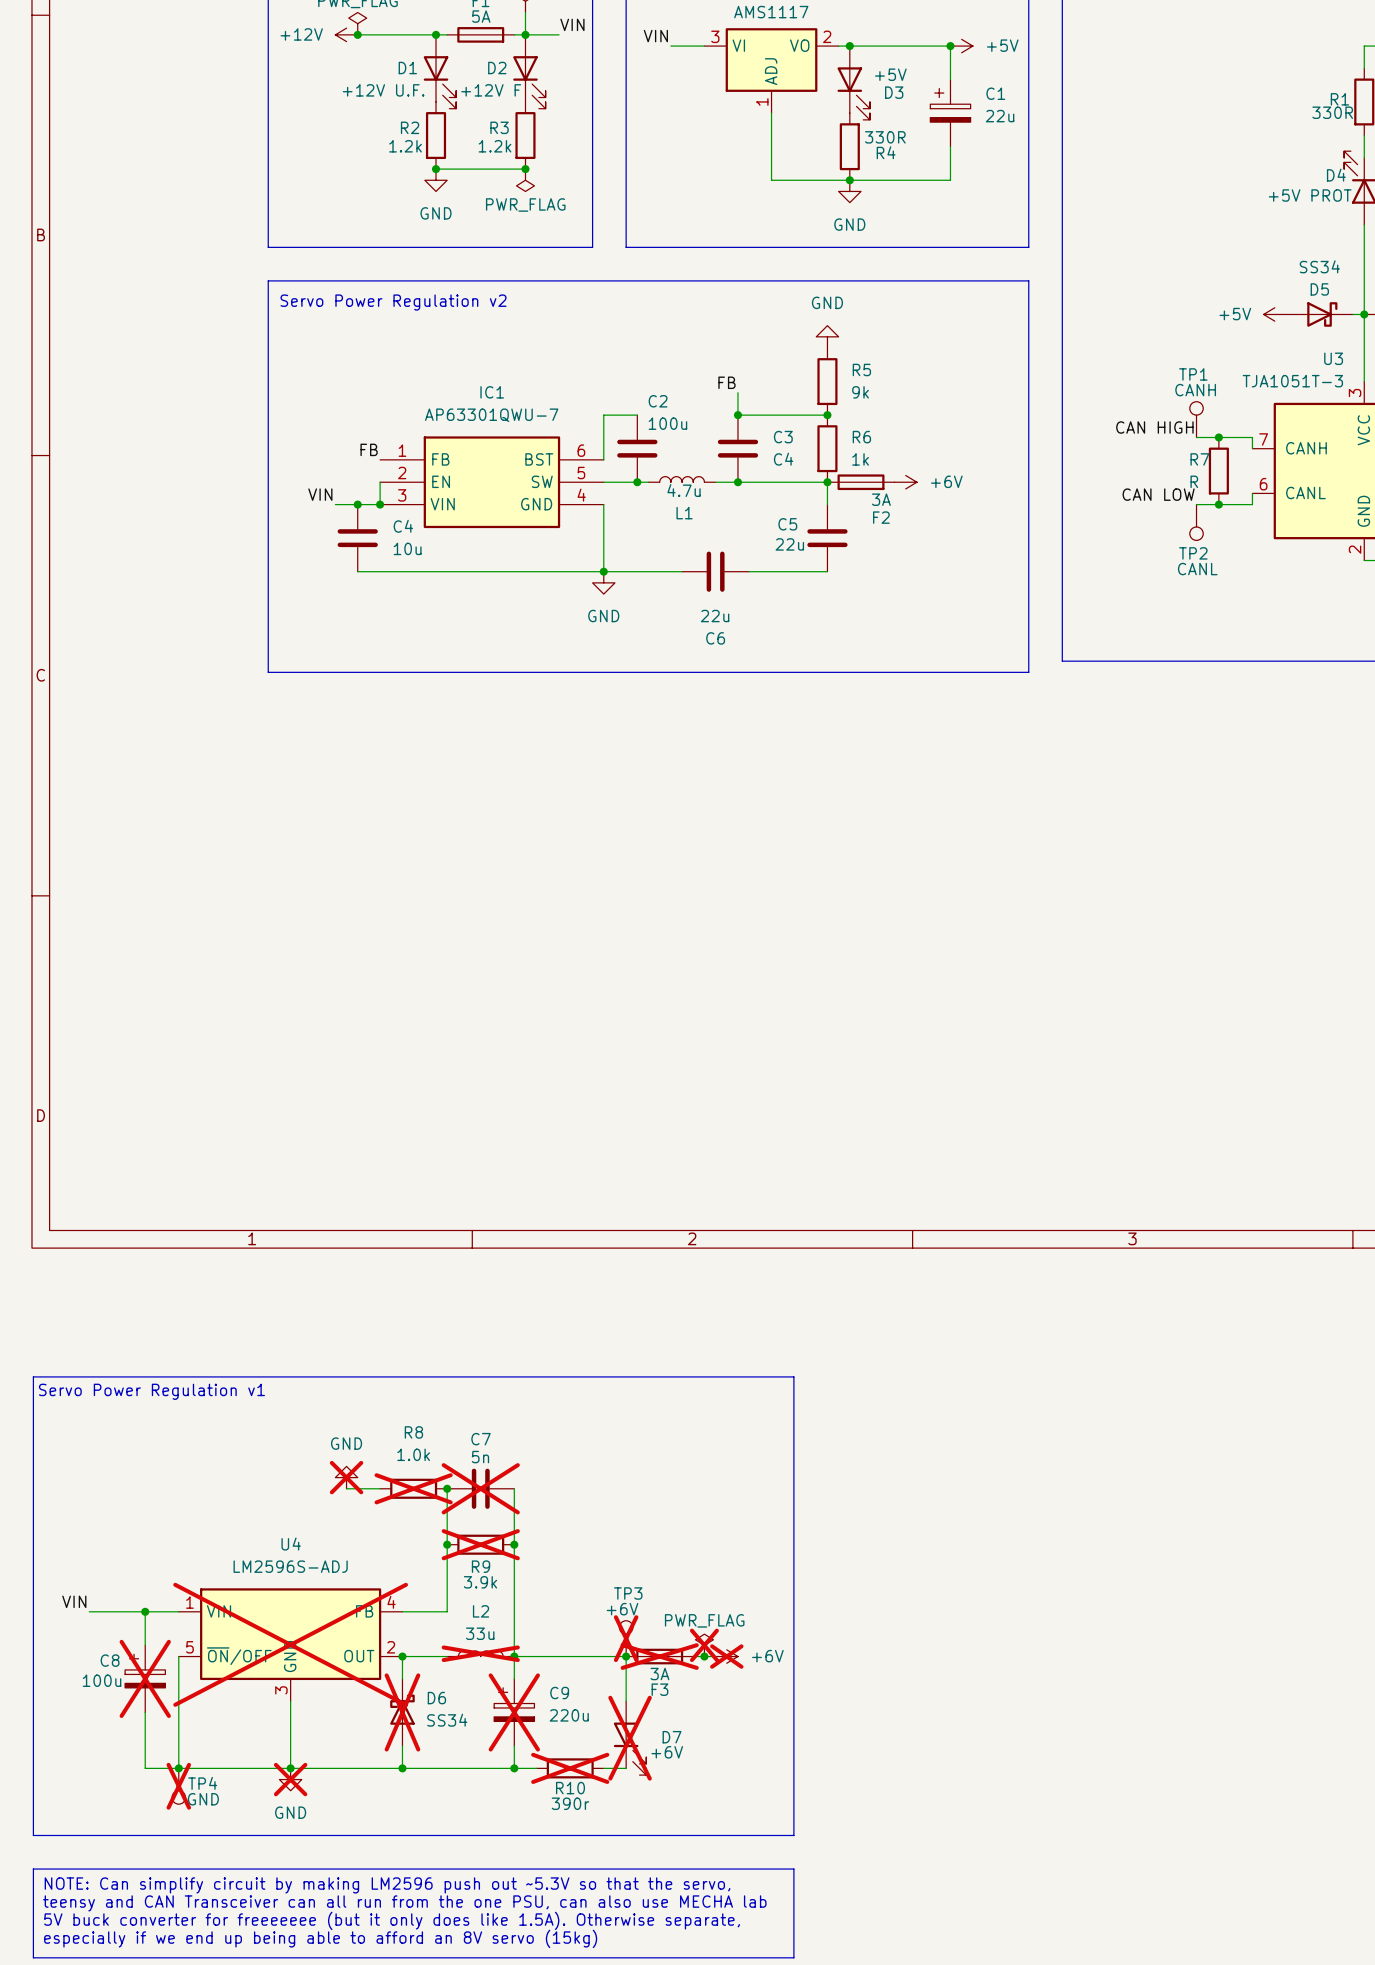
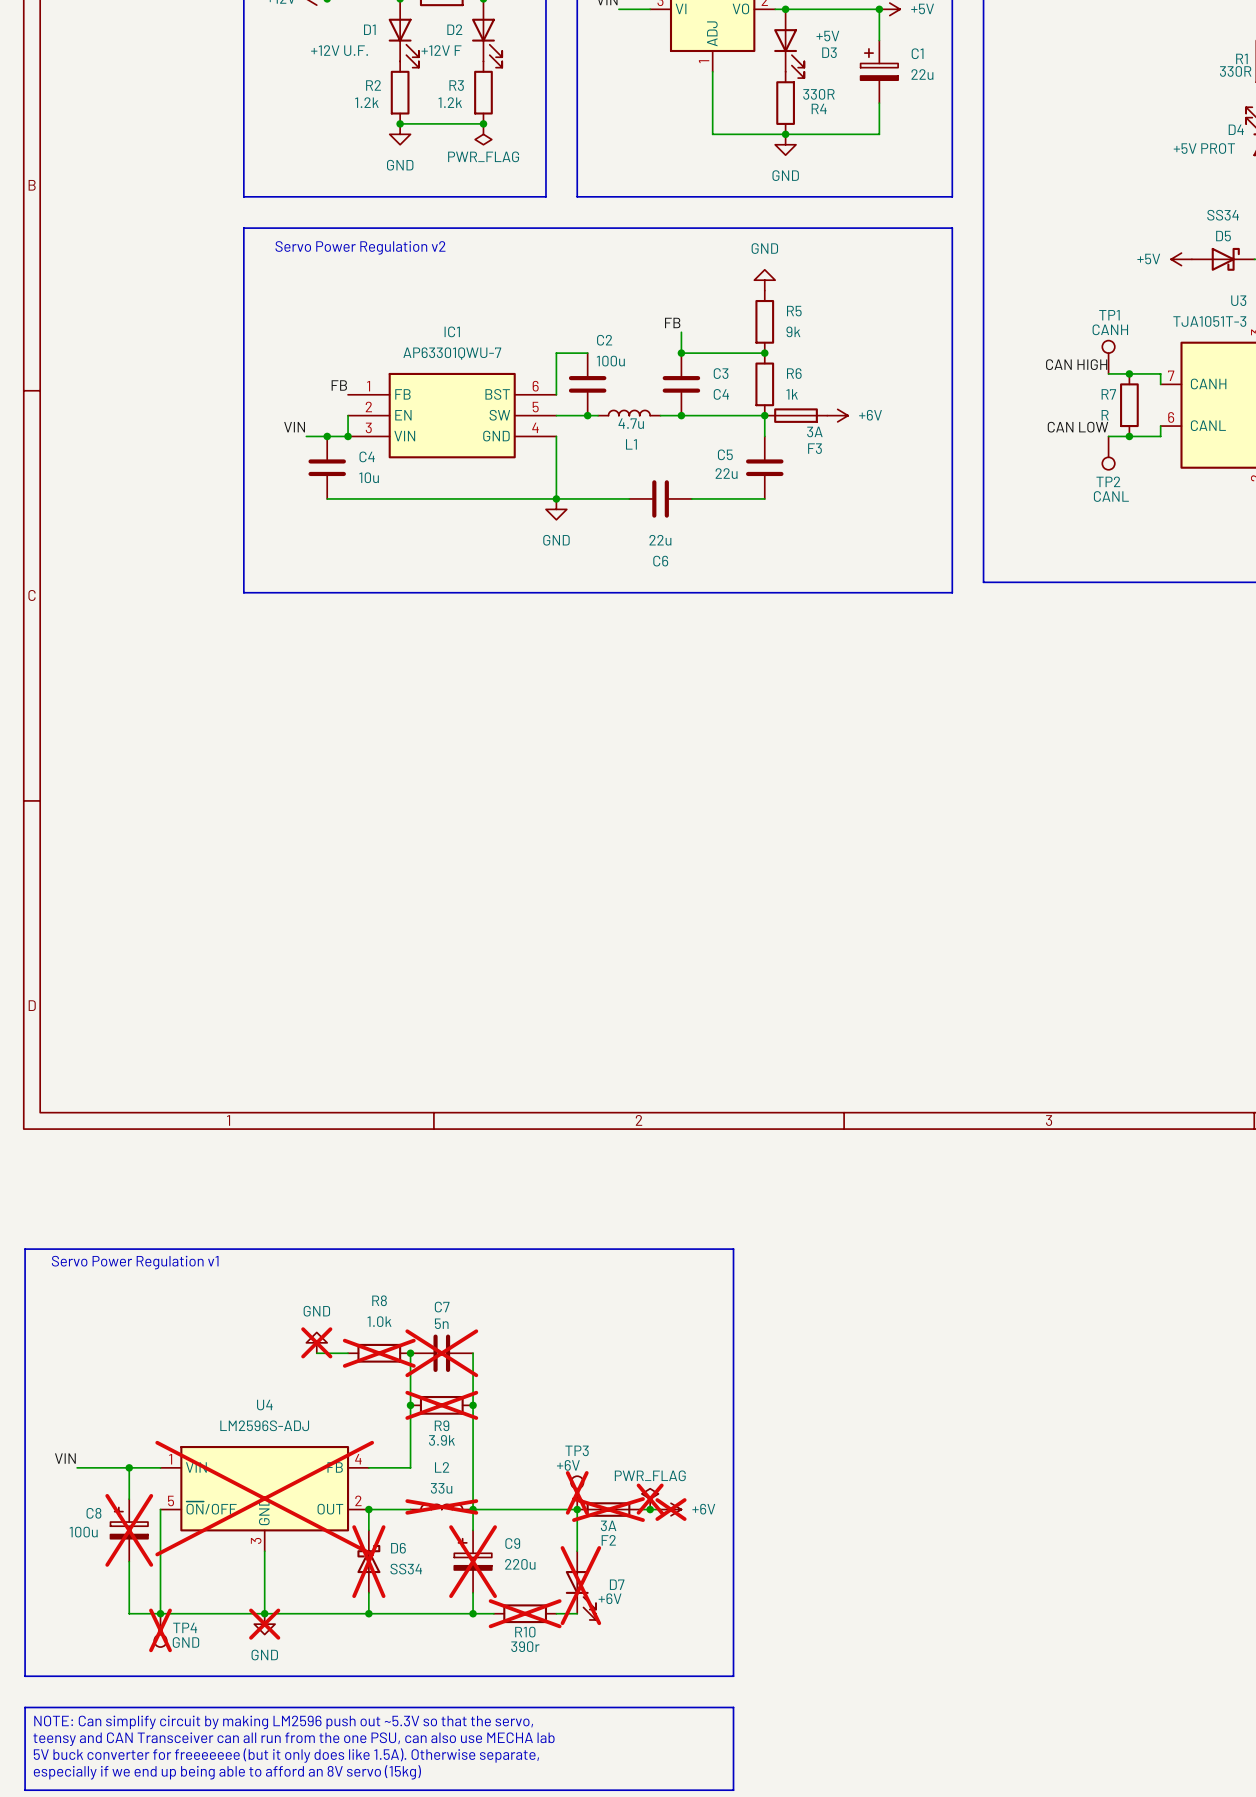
F2 name: F2 (881, 517) -> F3 (814, 448)
F3 name: F3 (659, 1689) -> F2 (608, 1540)

